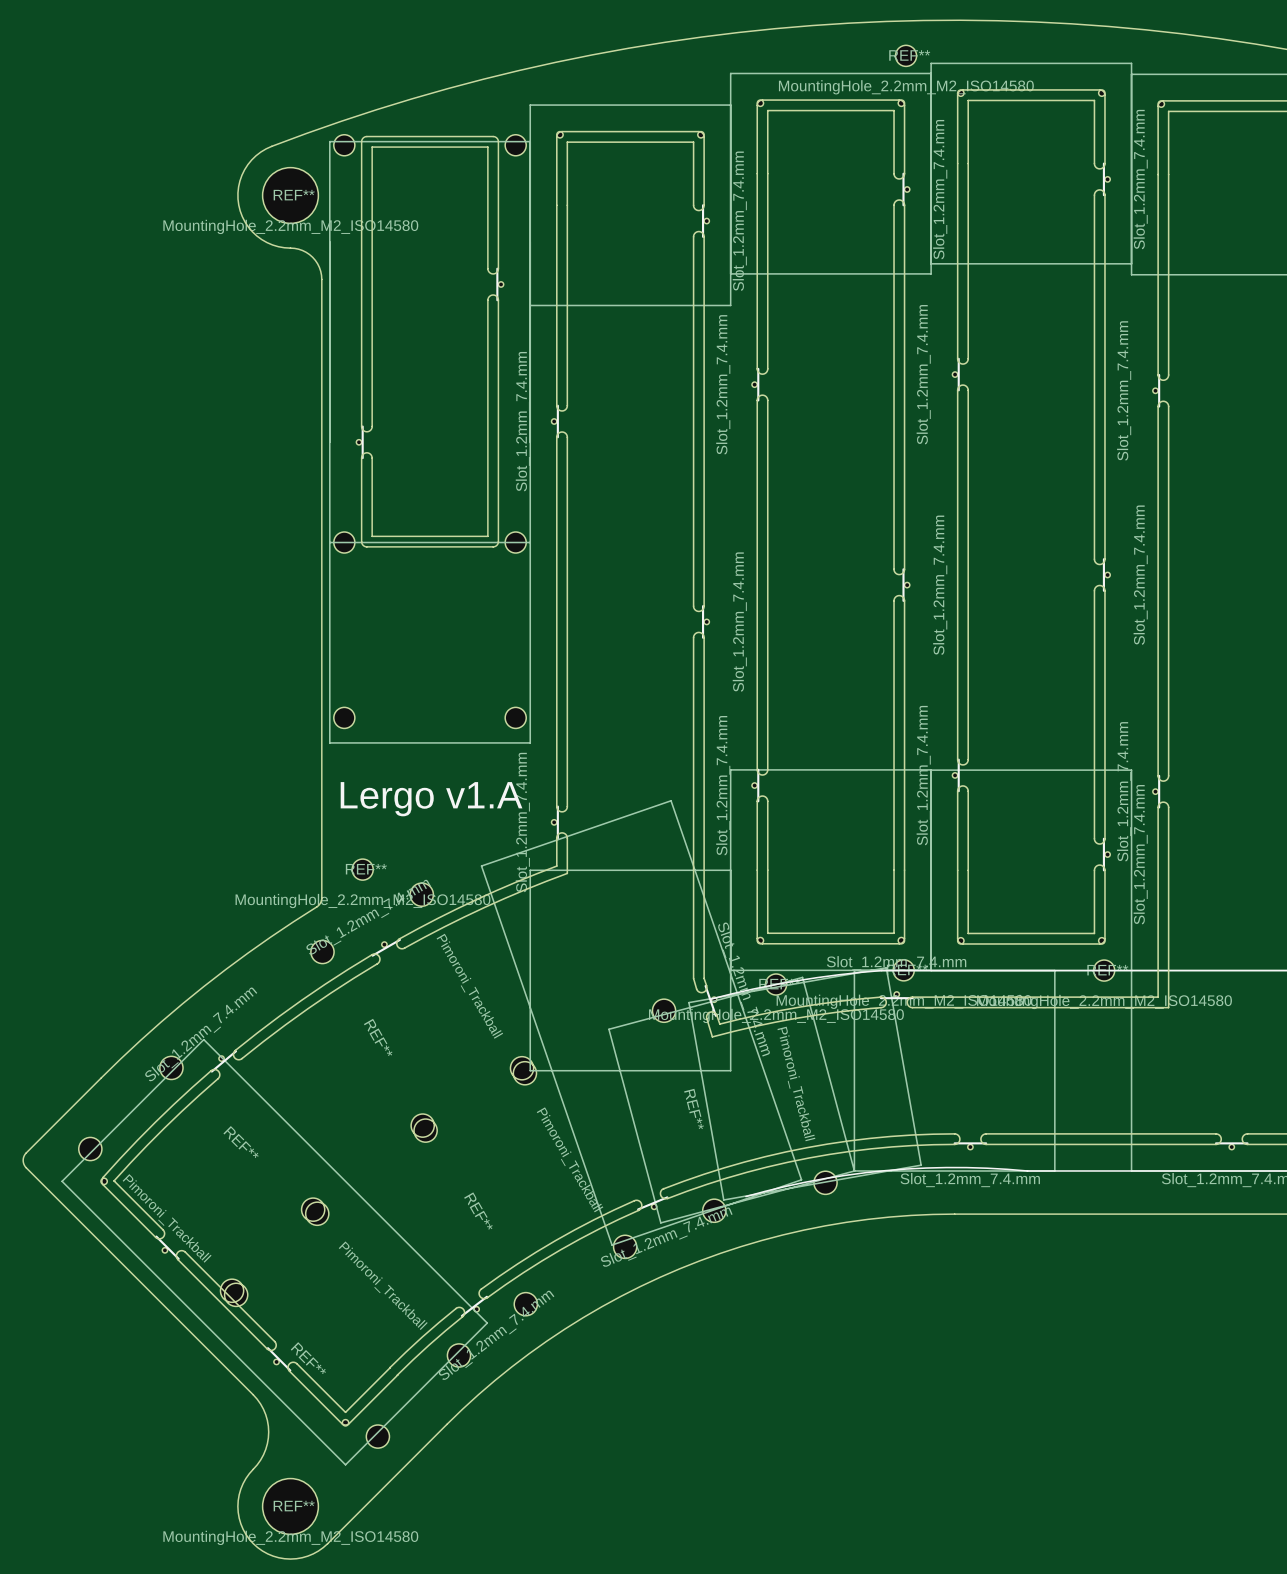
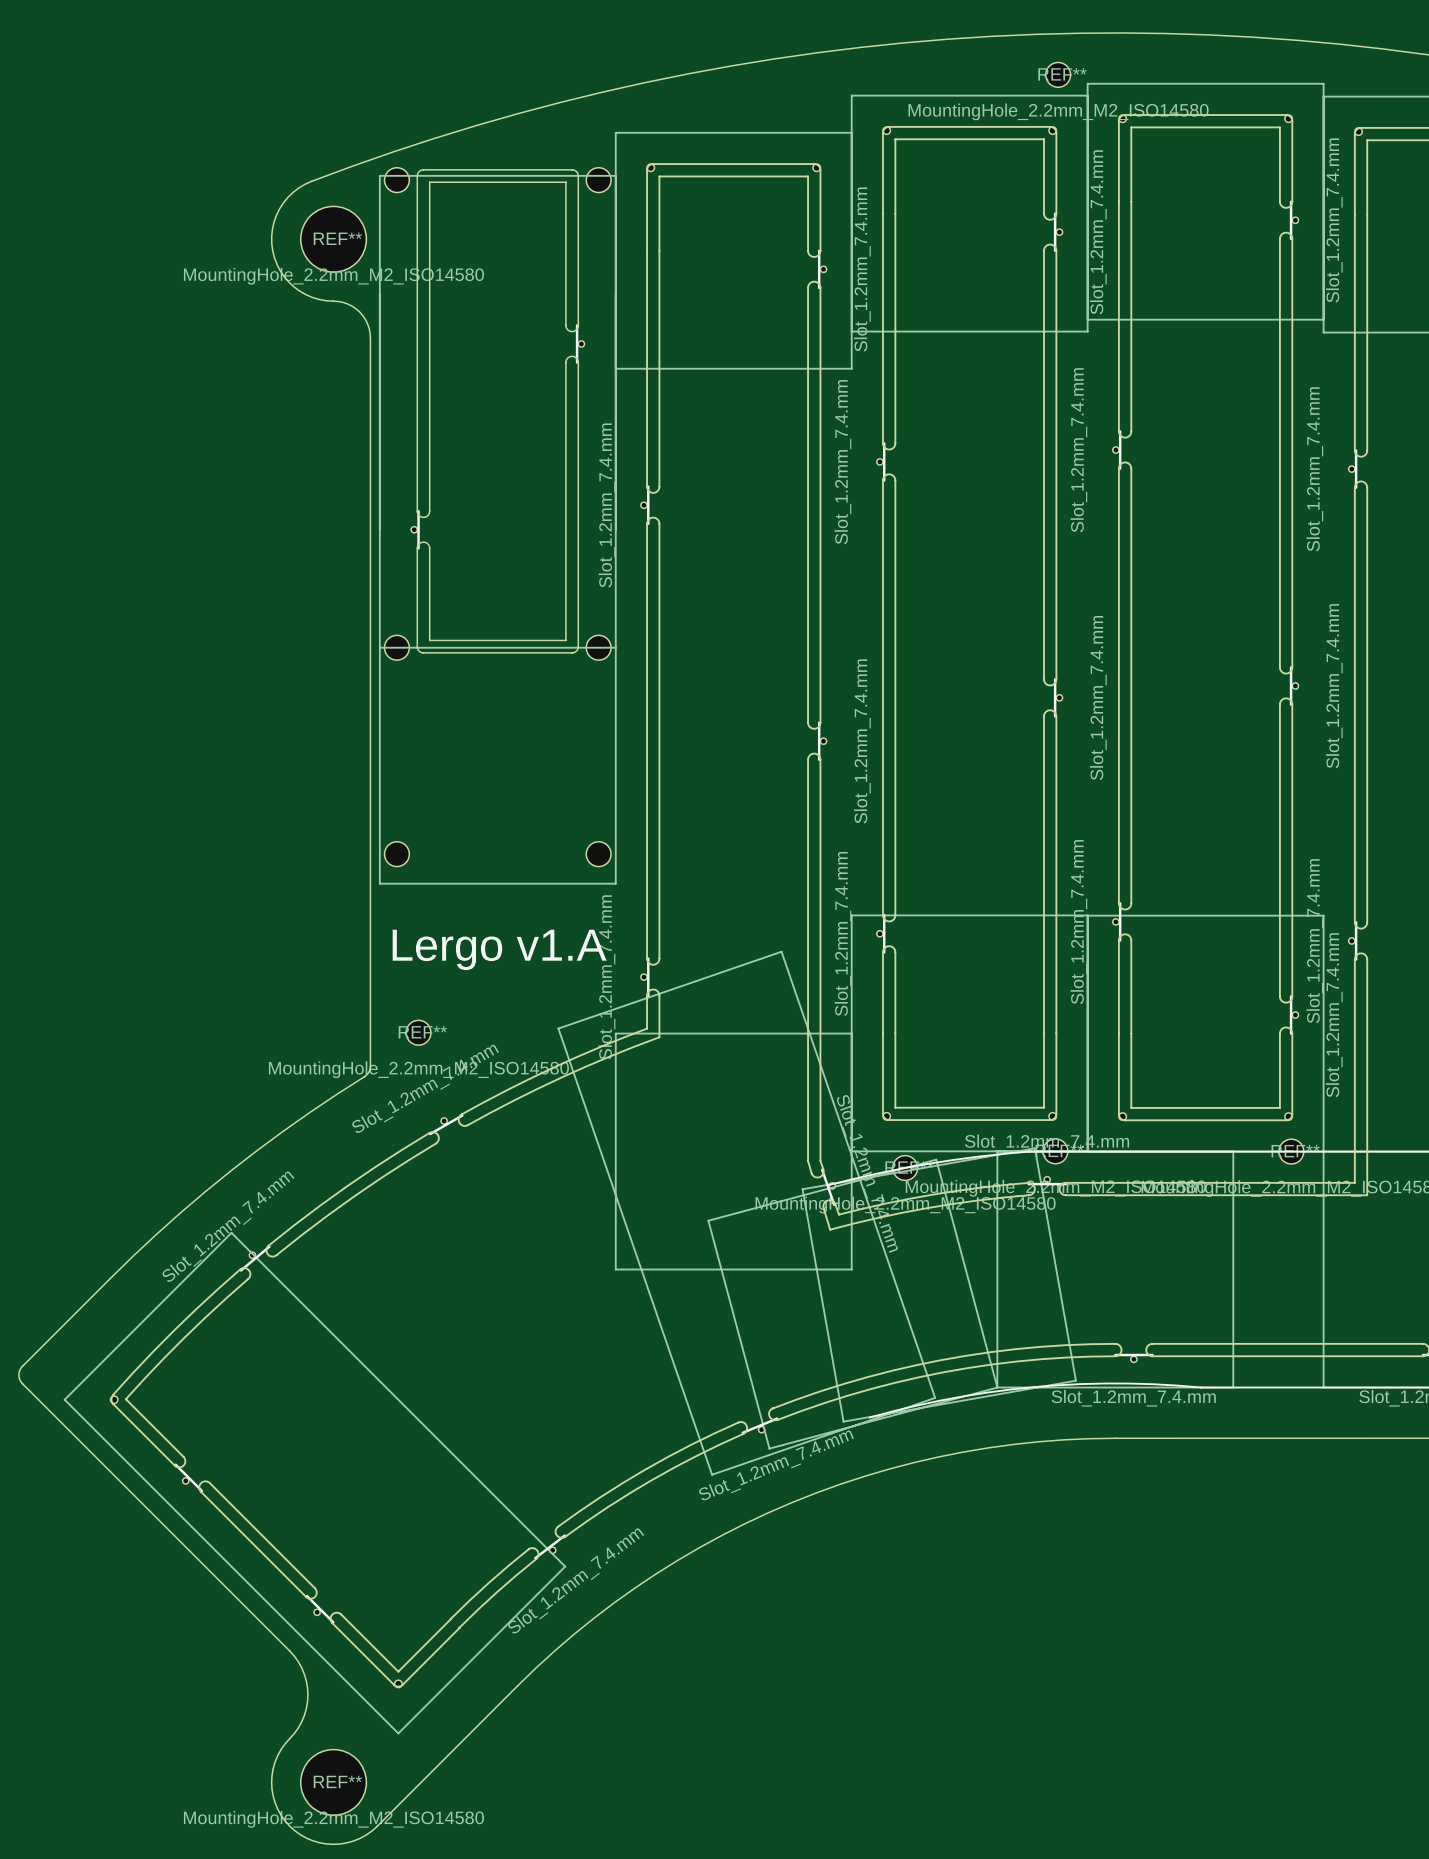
REF**: Pimoroni_Trackball (423, 1012) -> none
REF**: Pimoroni_Trackball (744, 1099) -> none
REF**: Pimoroni_Trackball (203, 1181) -> none
REF**: Pimoroni_Trackball (523, 1186) -> none
REF**: Pimoroni_Trackball (345, 1323) -> none

